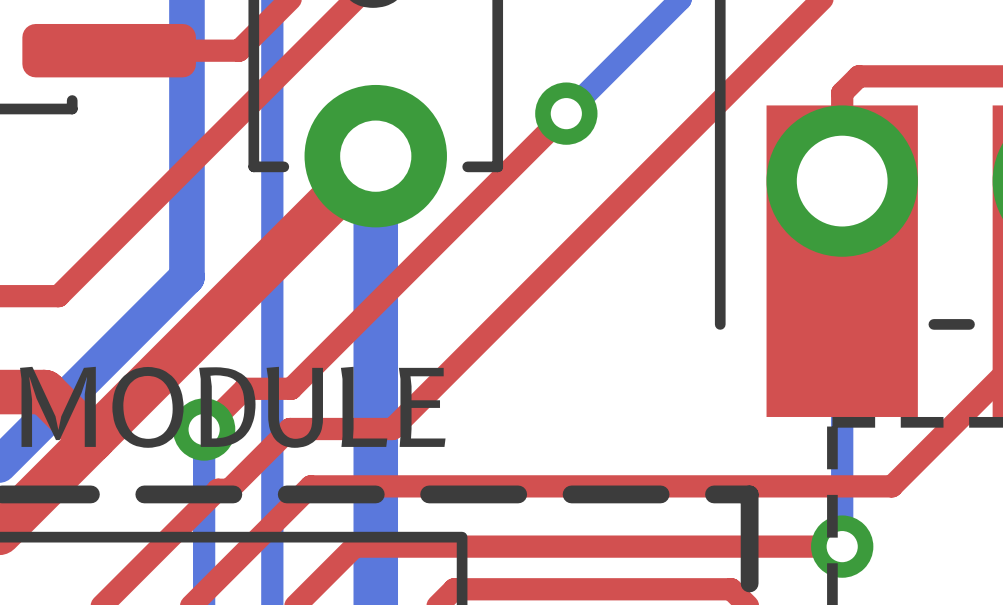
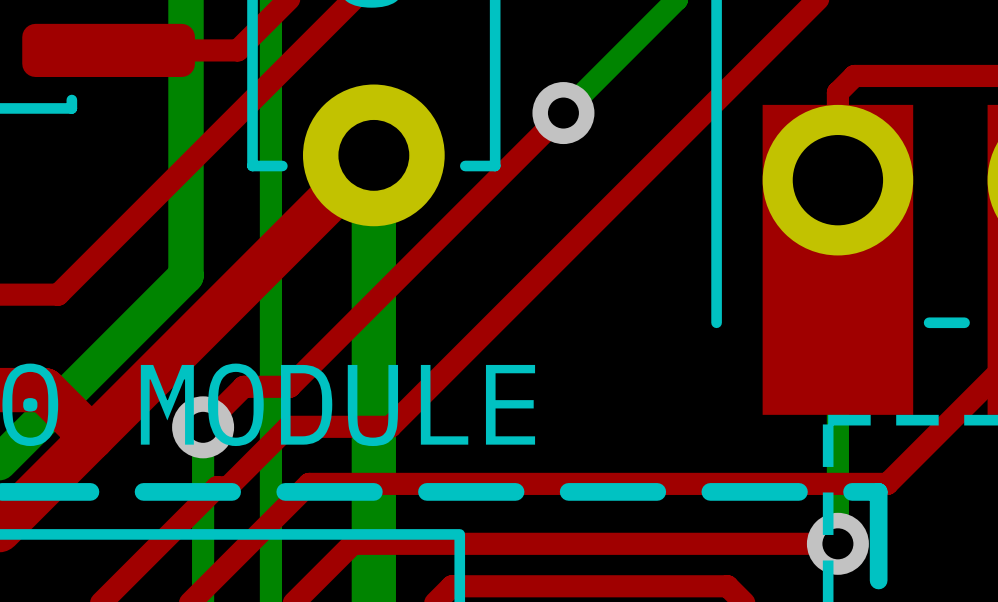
line: (749, 494) (749, 583) -> (745, 491) (798, 491)
line: none -> (852, 491) (878, 491) (878, 580)

